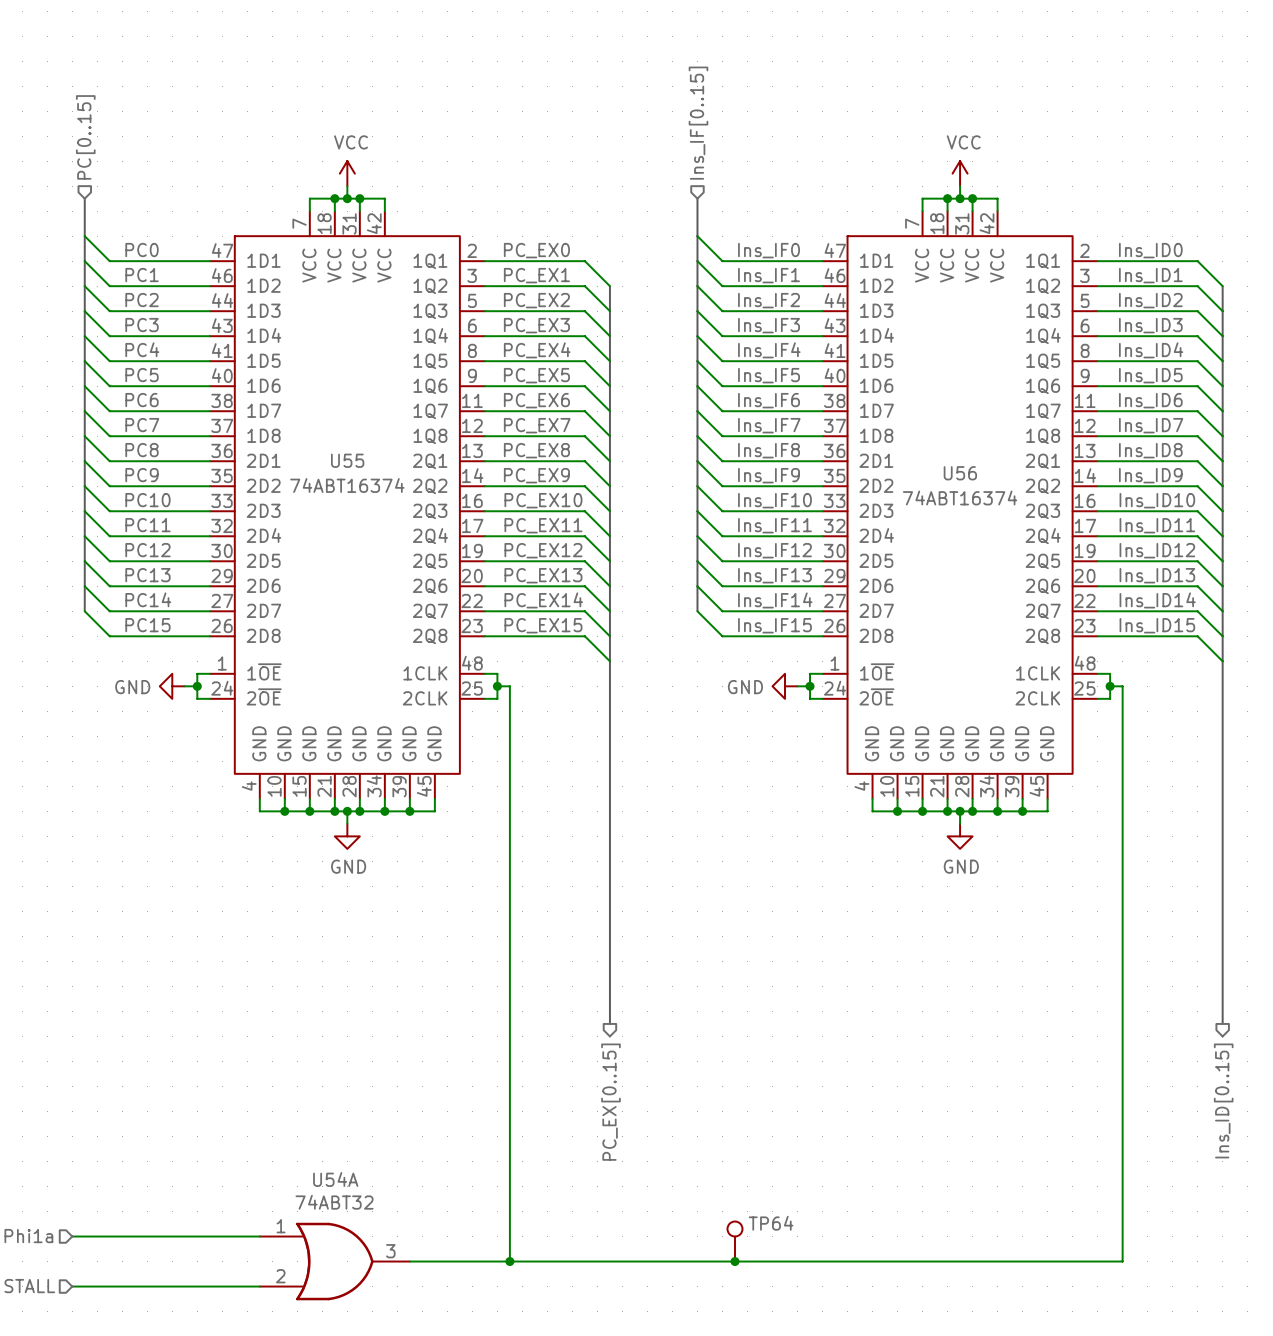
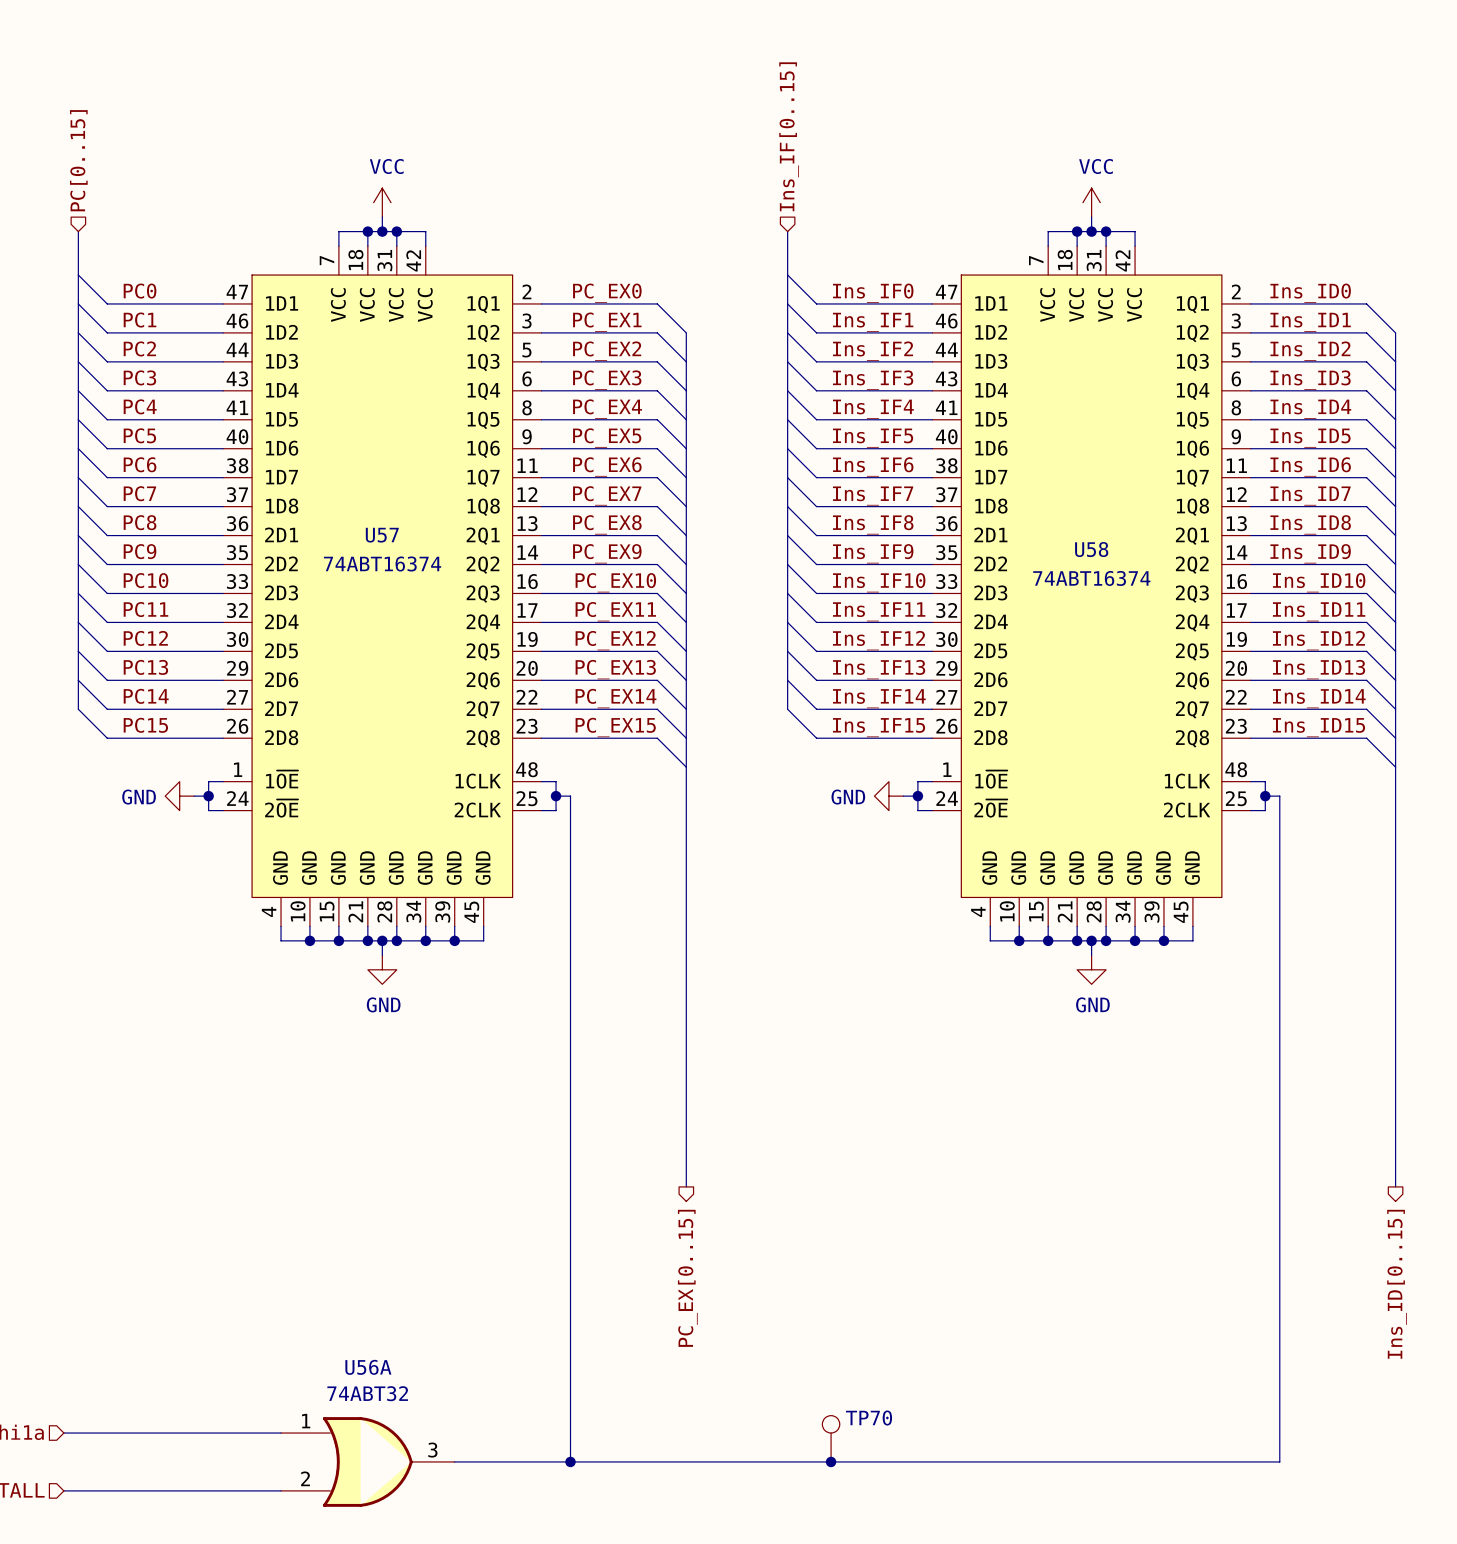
U55 name: U55 (347, 460) -> U57 (382, 535)
U56 name: U56 (960, 473) -> U58 (1091, 549)
U54A name: U54A (335, 1179) -> U56A (368, 1367)
TP64 name: TP64 (771, 1223) -> TP70 (869, 1418)

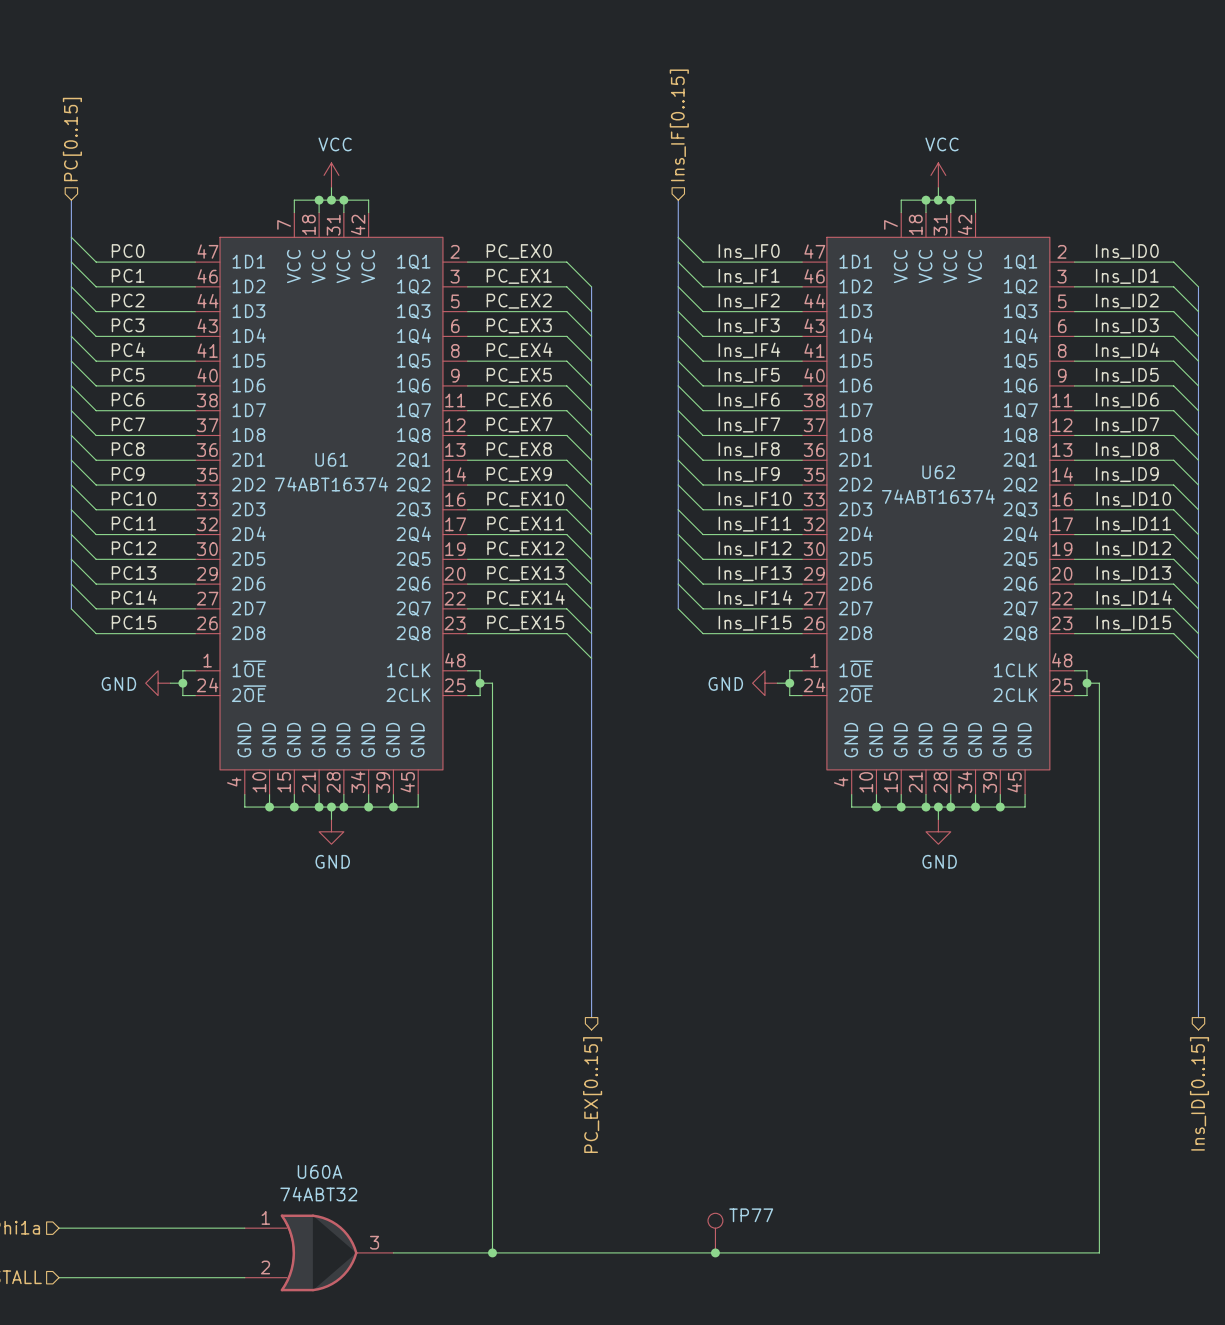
U57 name: U57 (382, 535) -> U61 (331, 459)
U58 name: U58 (1091, 549) -> U62 (938, 472)
U56A name: U56A (368, 1367) -> U60A (319, 1171)
TP70 name: TP70 (869, 1418) -> TP77 (751, 1215)

